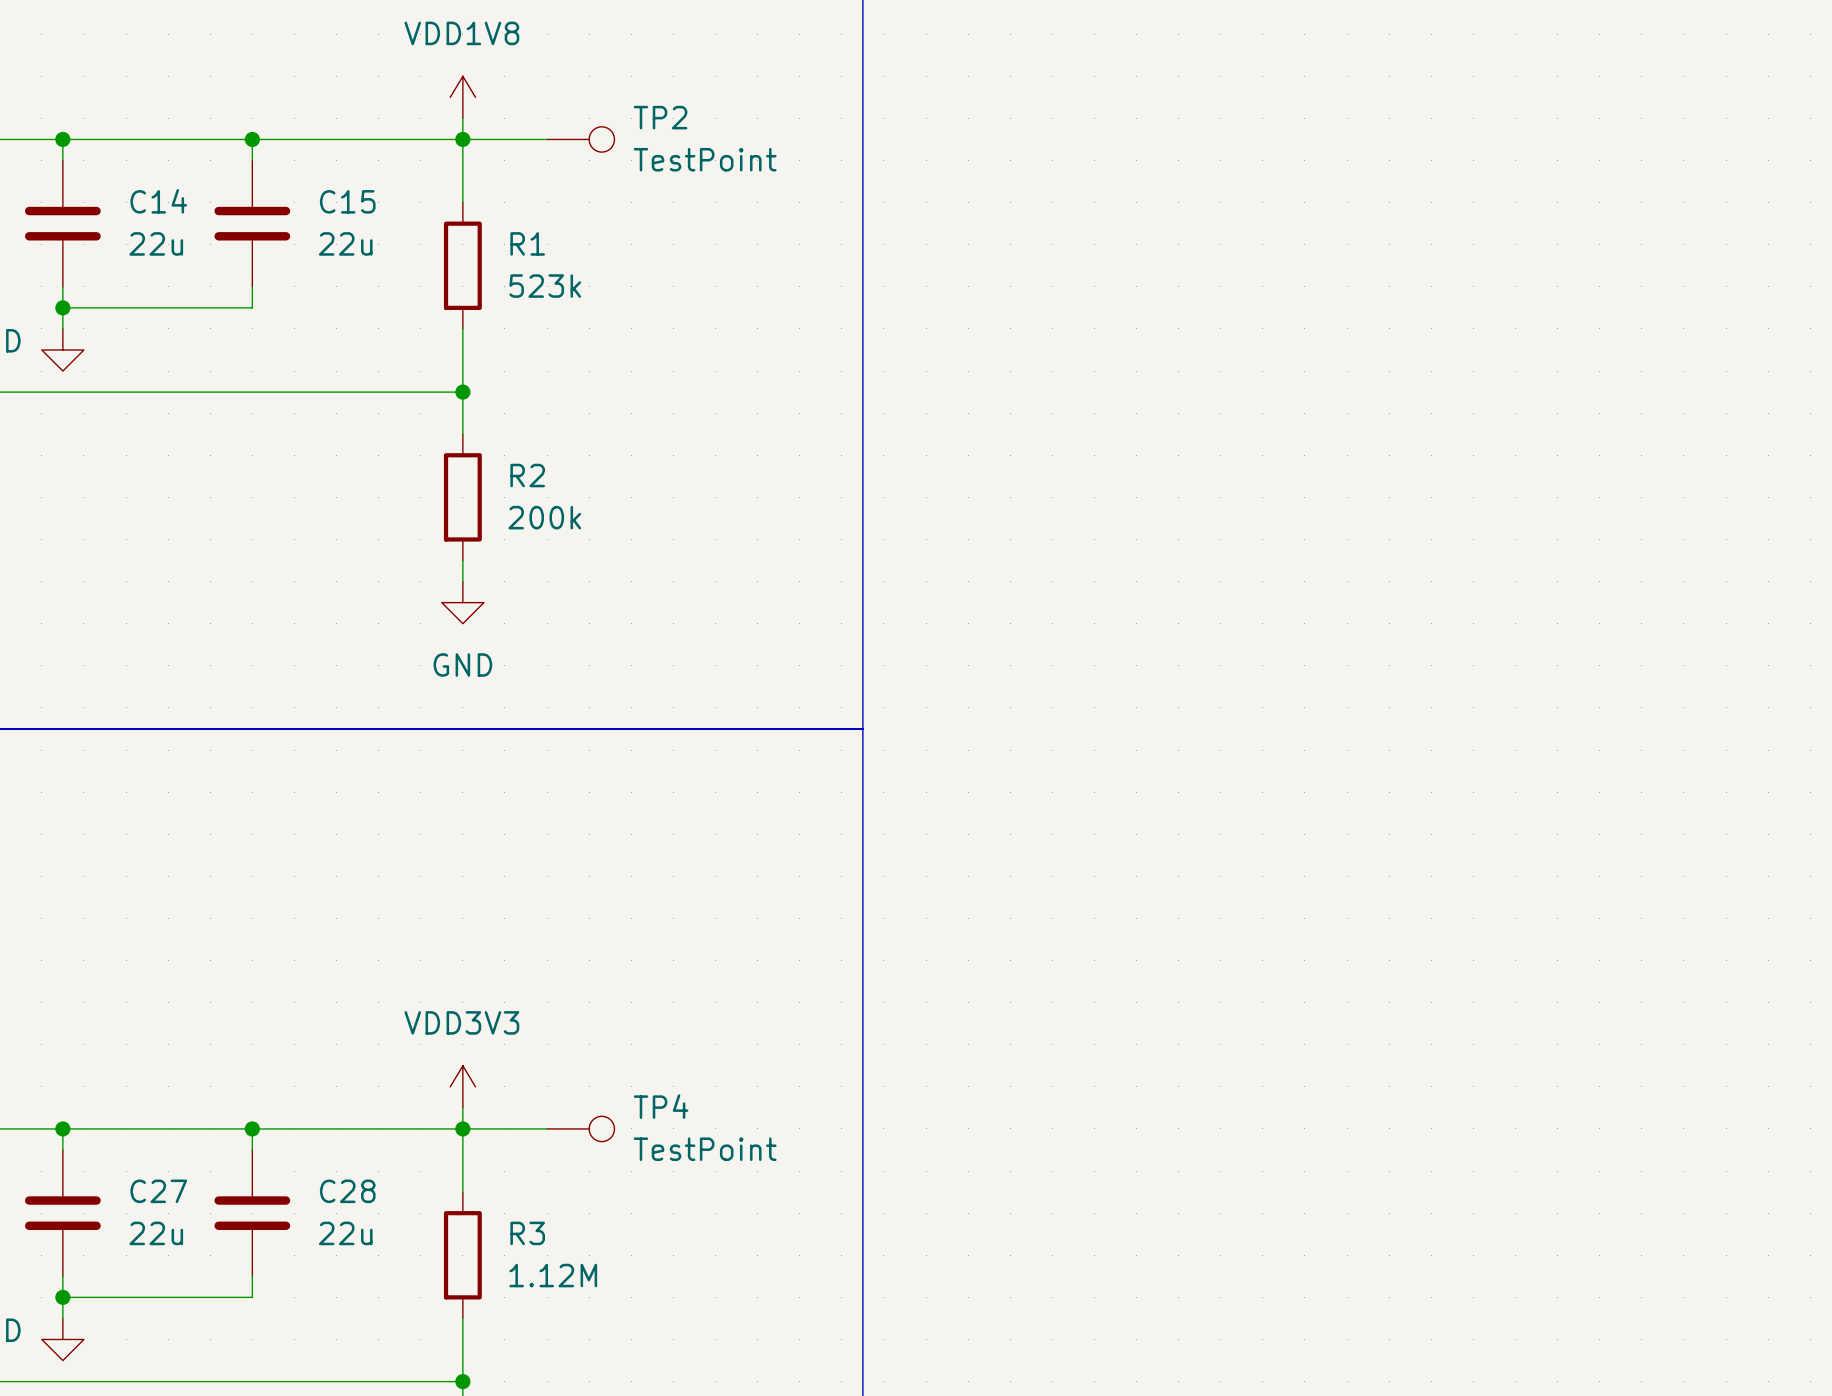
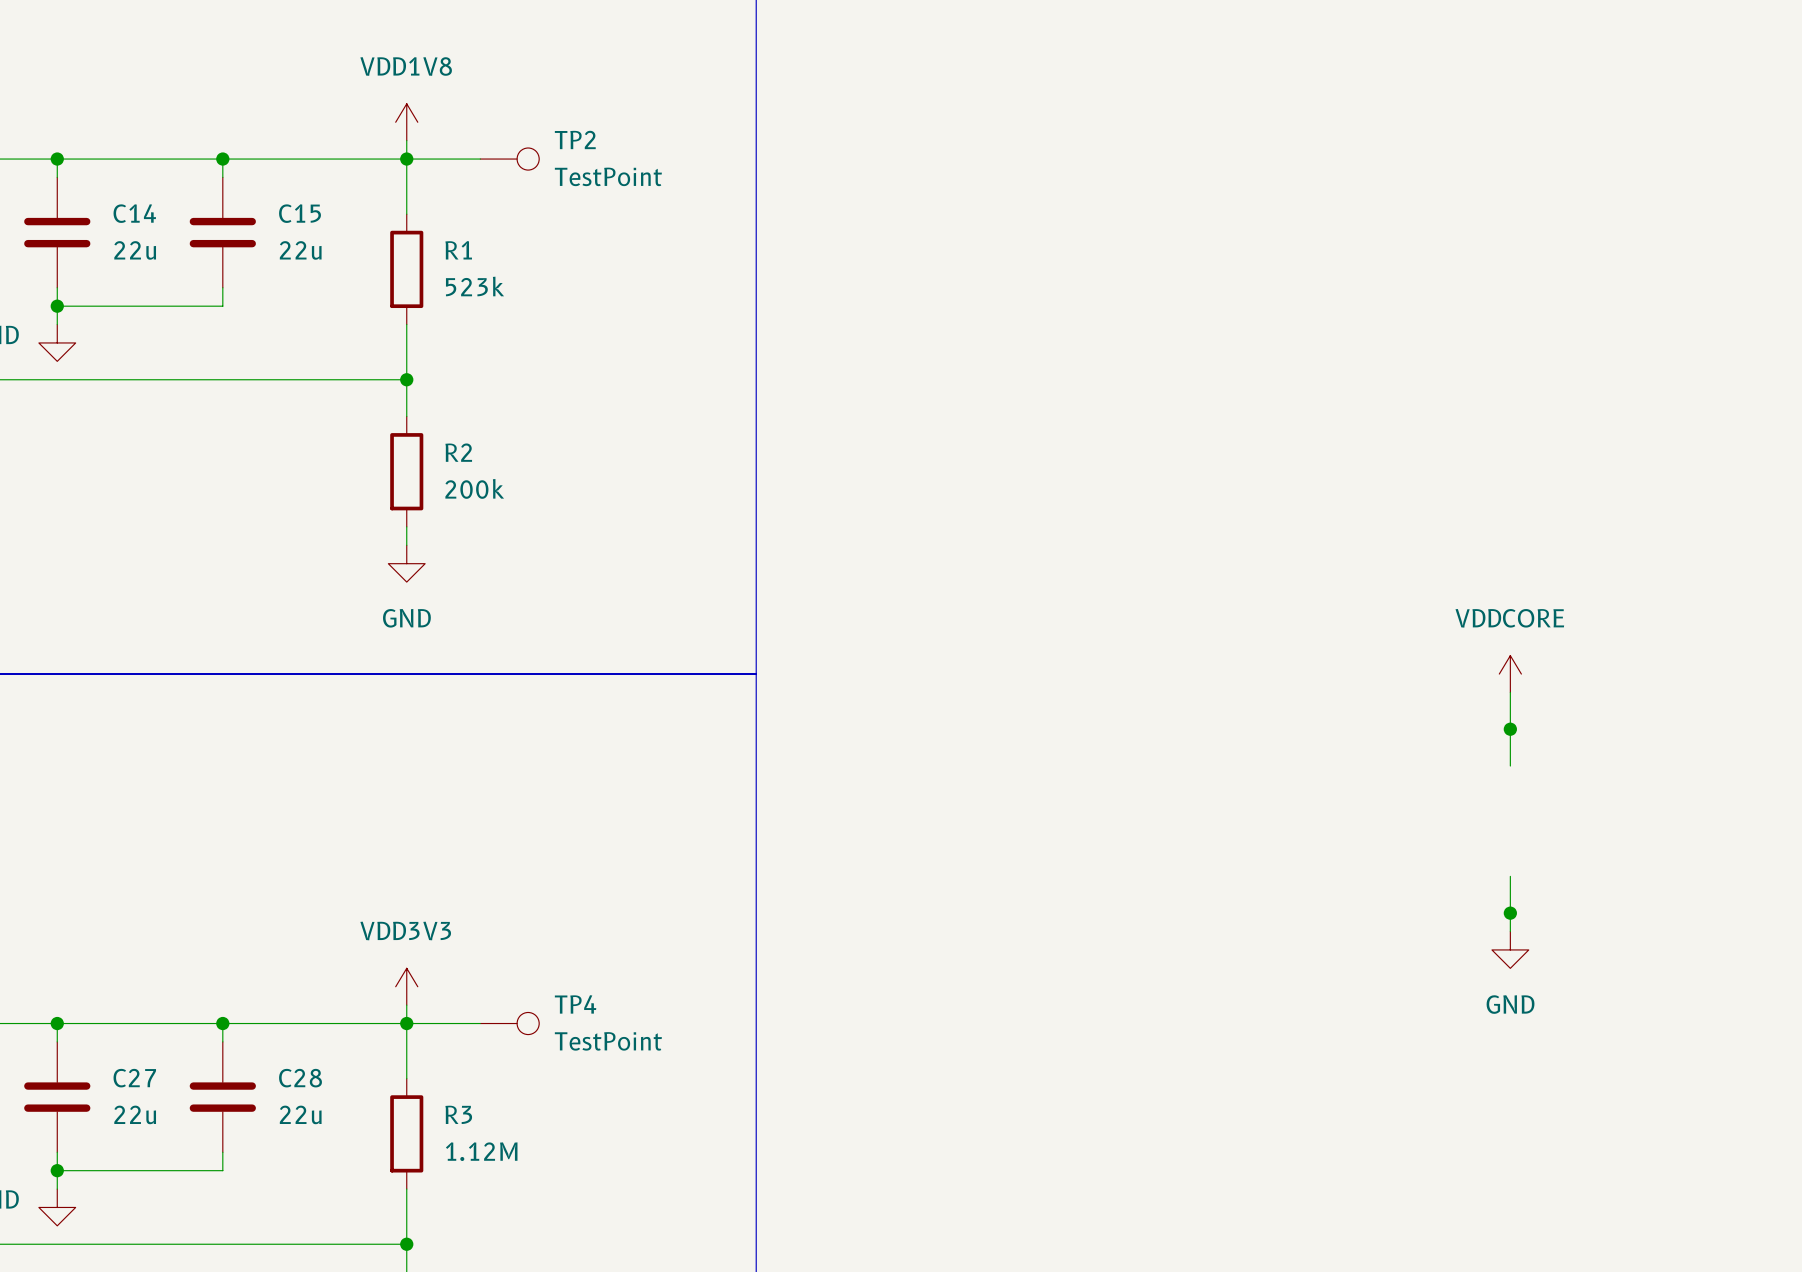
power symbol: none -> VDDCORE (1510, 674)
wire: none -> (1510, 692) (1510, 766)
junction: none -> (1510, 729)
wire: none -> (1510, 876) (1510, 931)
junction: none -> (1510, 913)
power symbol: none -> GND (1510, 949)

